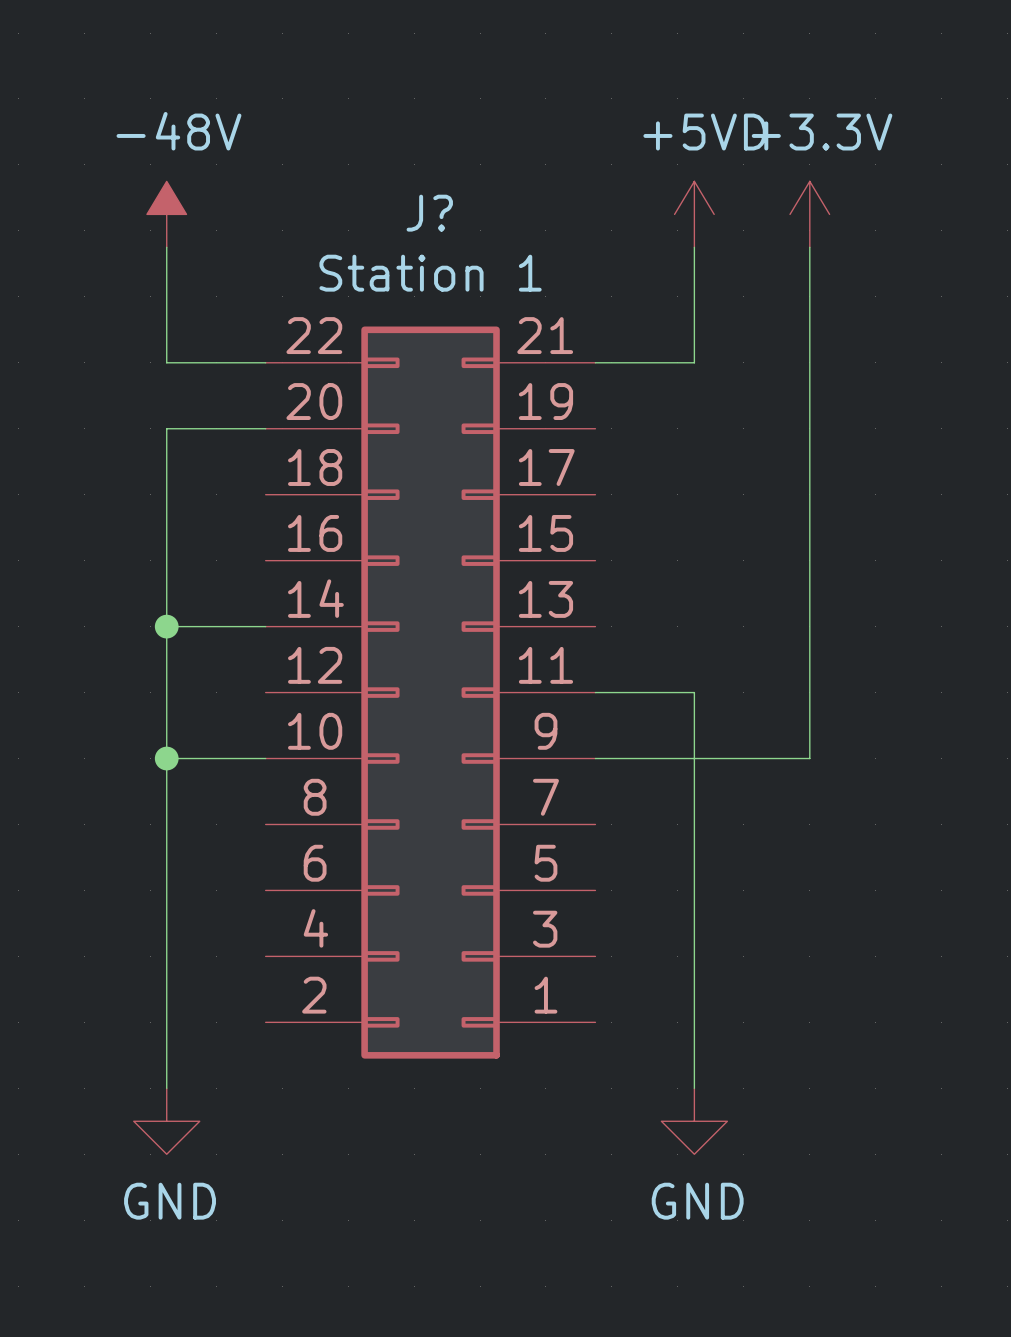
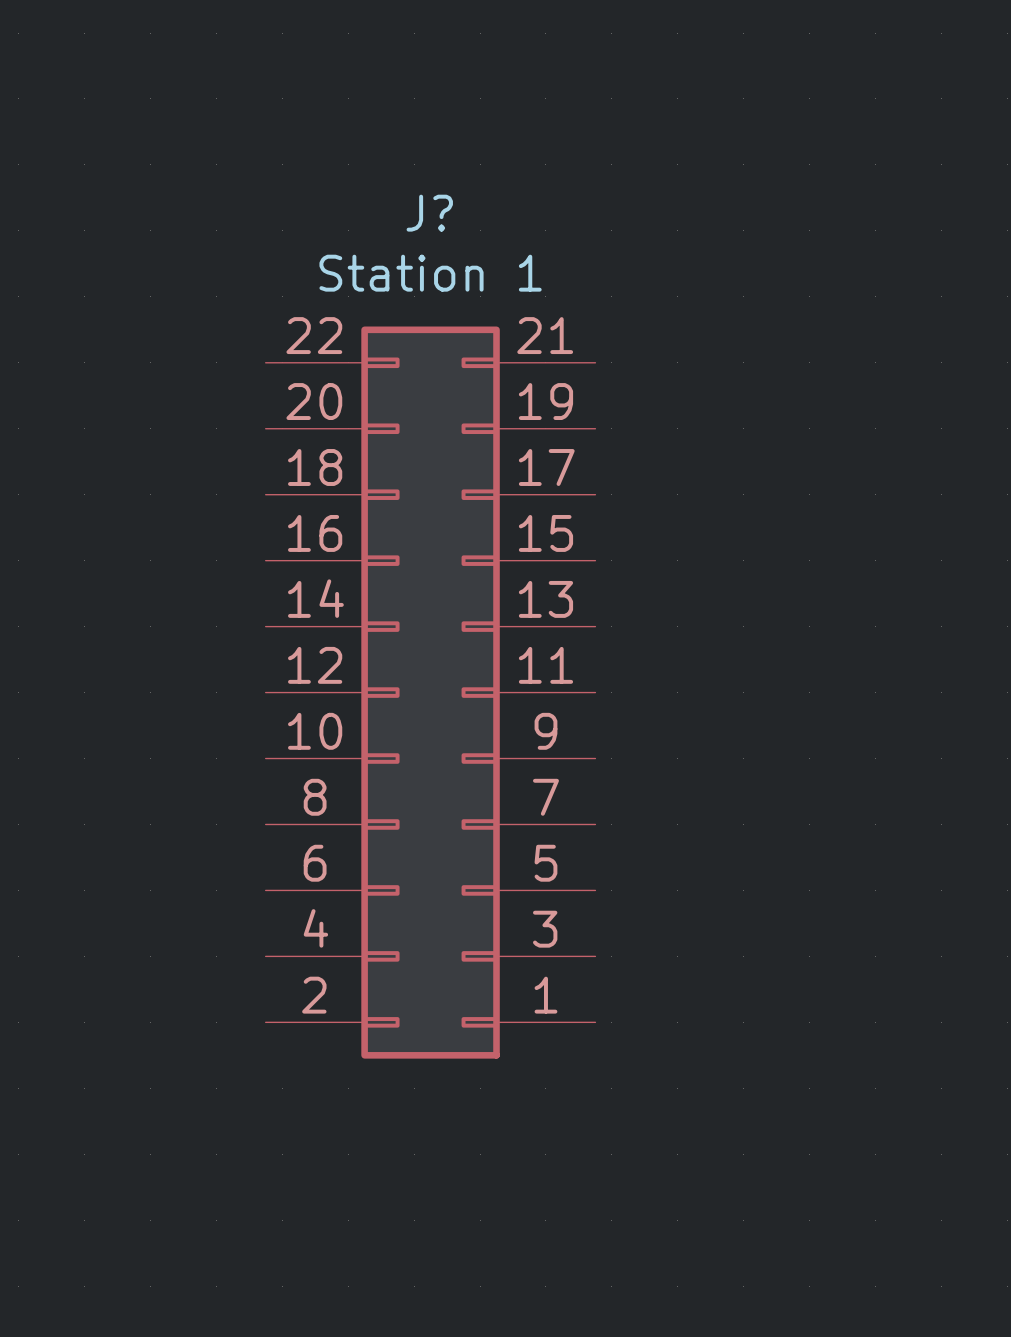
power symbol: -48V (166, 214) -> none
power symbol: +5VD (694, 214) -> none
power symbol: +3.3V (809, 214) -> none
wire: (166, 247) (166, 362) (265, 362) -> none
wire: (694, 247) (694, 362) (595, 362) -> none
wire: (809, 247) (809, 758) (595, 758) -> none
wire: (265, 428) (166, 428) (166, 1088) -> none
wire: (166, 626) (265, 626) -> none
junction: (166, 626) -> none
wire: (595, 692) (694, 692) (694, 1088) -> none
wire: (166, 758) (265, 758) -> none
junction: (166, 758) -> none
power symbol: GND (166, 1121) -> none
power symbol: GND (694, 1121) -> none

